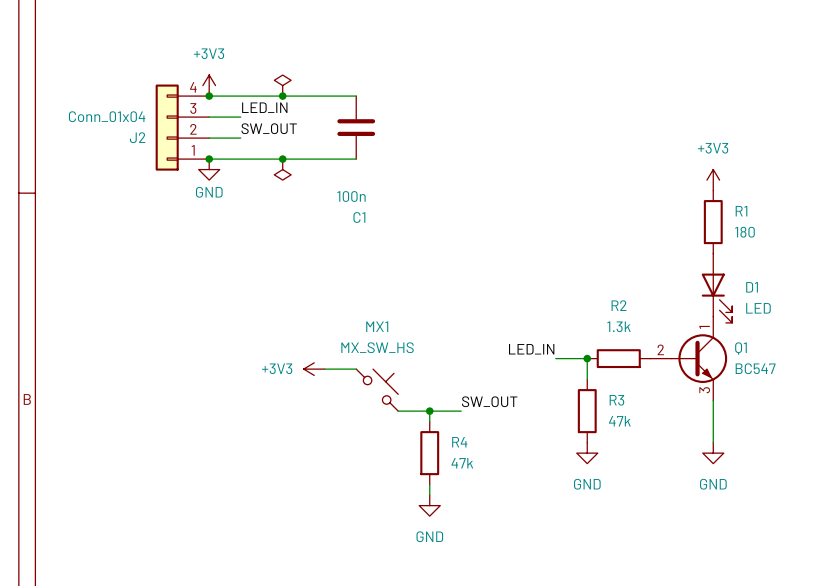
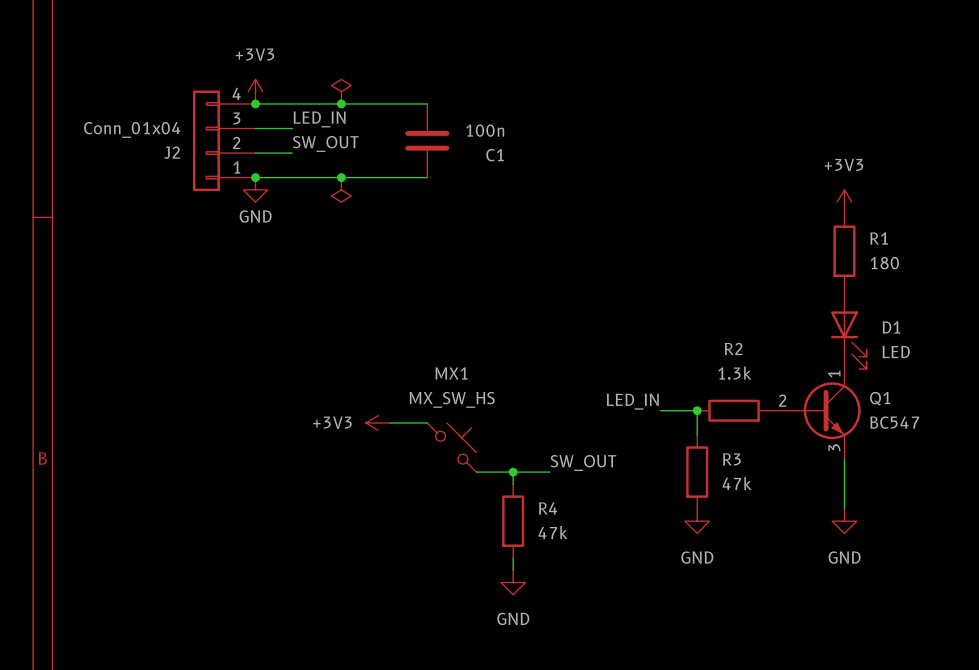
C1 value position: 100n (351, 196) -> 100n (485, 130)
C1 name position: C1 (359, 217) -> C1 (495, 155)

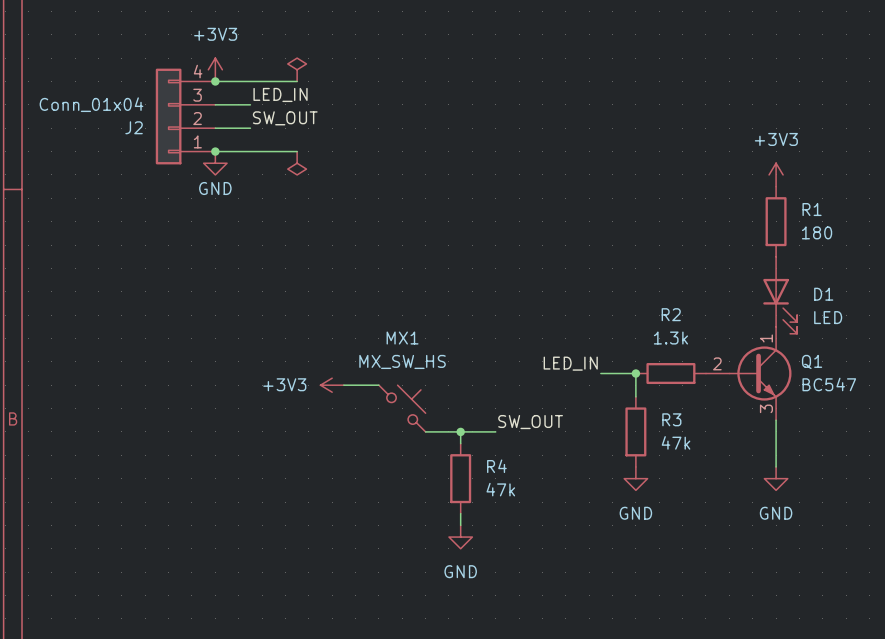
wire: (341, 103) (427, 103) -> none
junction: (341, 103) -> none
C1: 100n (427, 140) -> none
wire: (341, 177) (427, 177) -> none
junction: (341, 177) -> none

